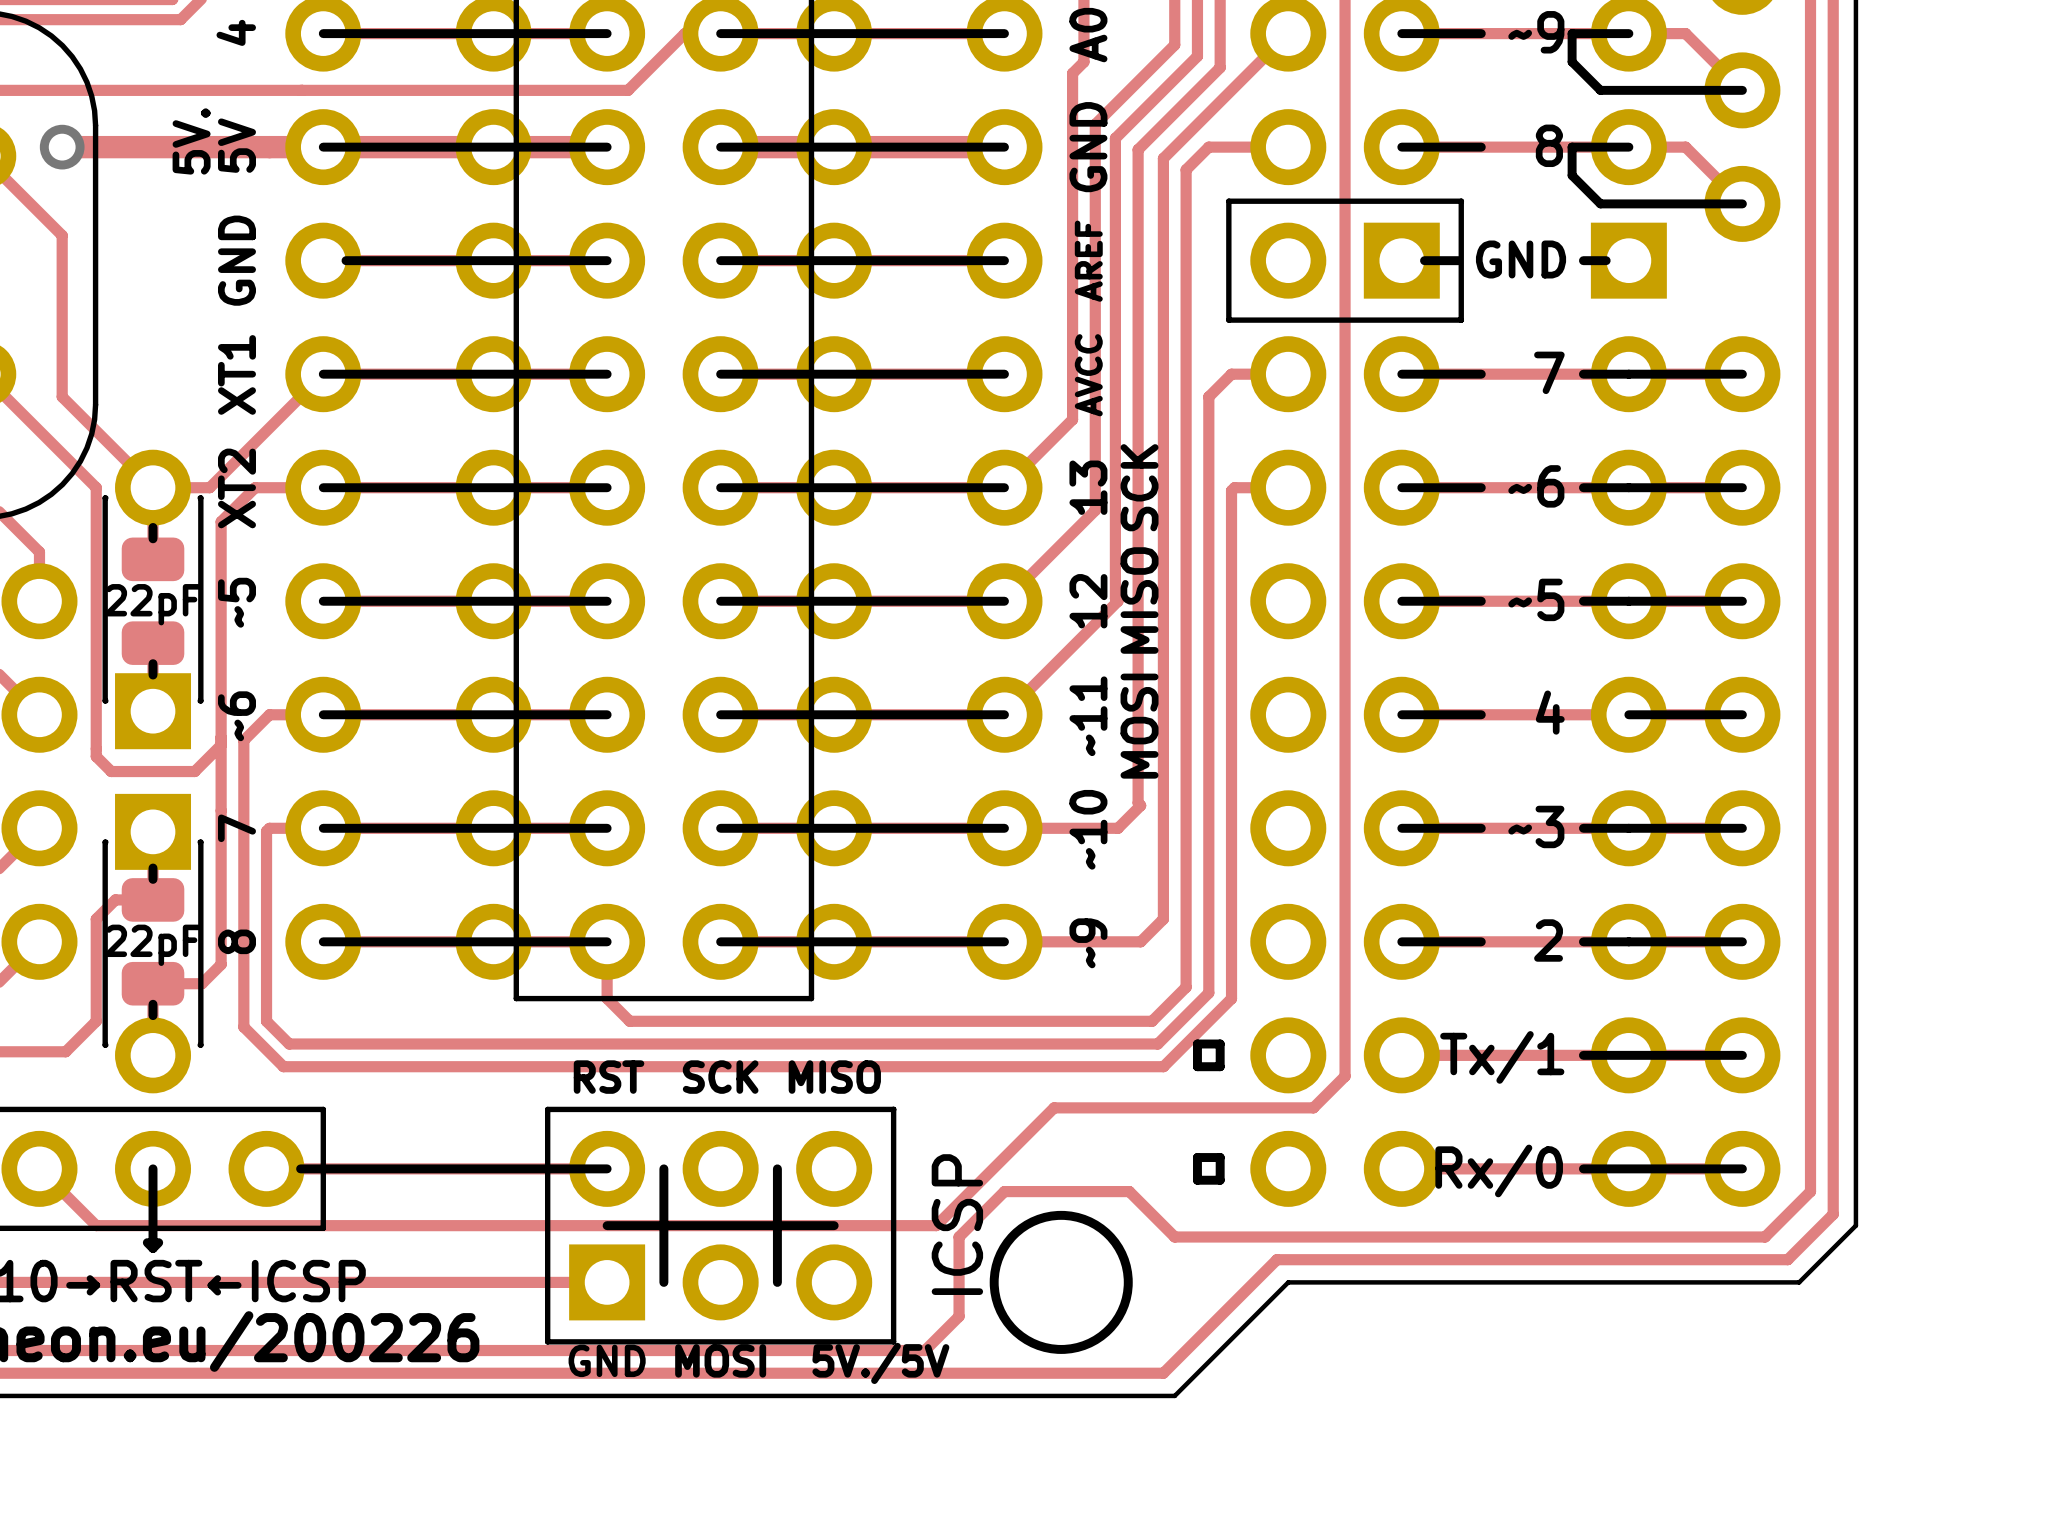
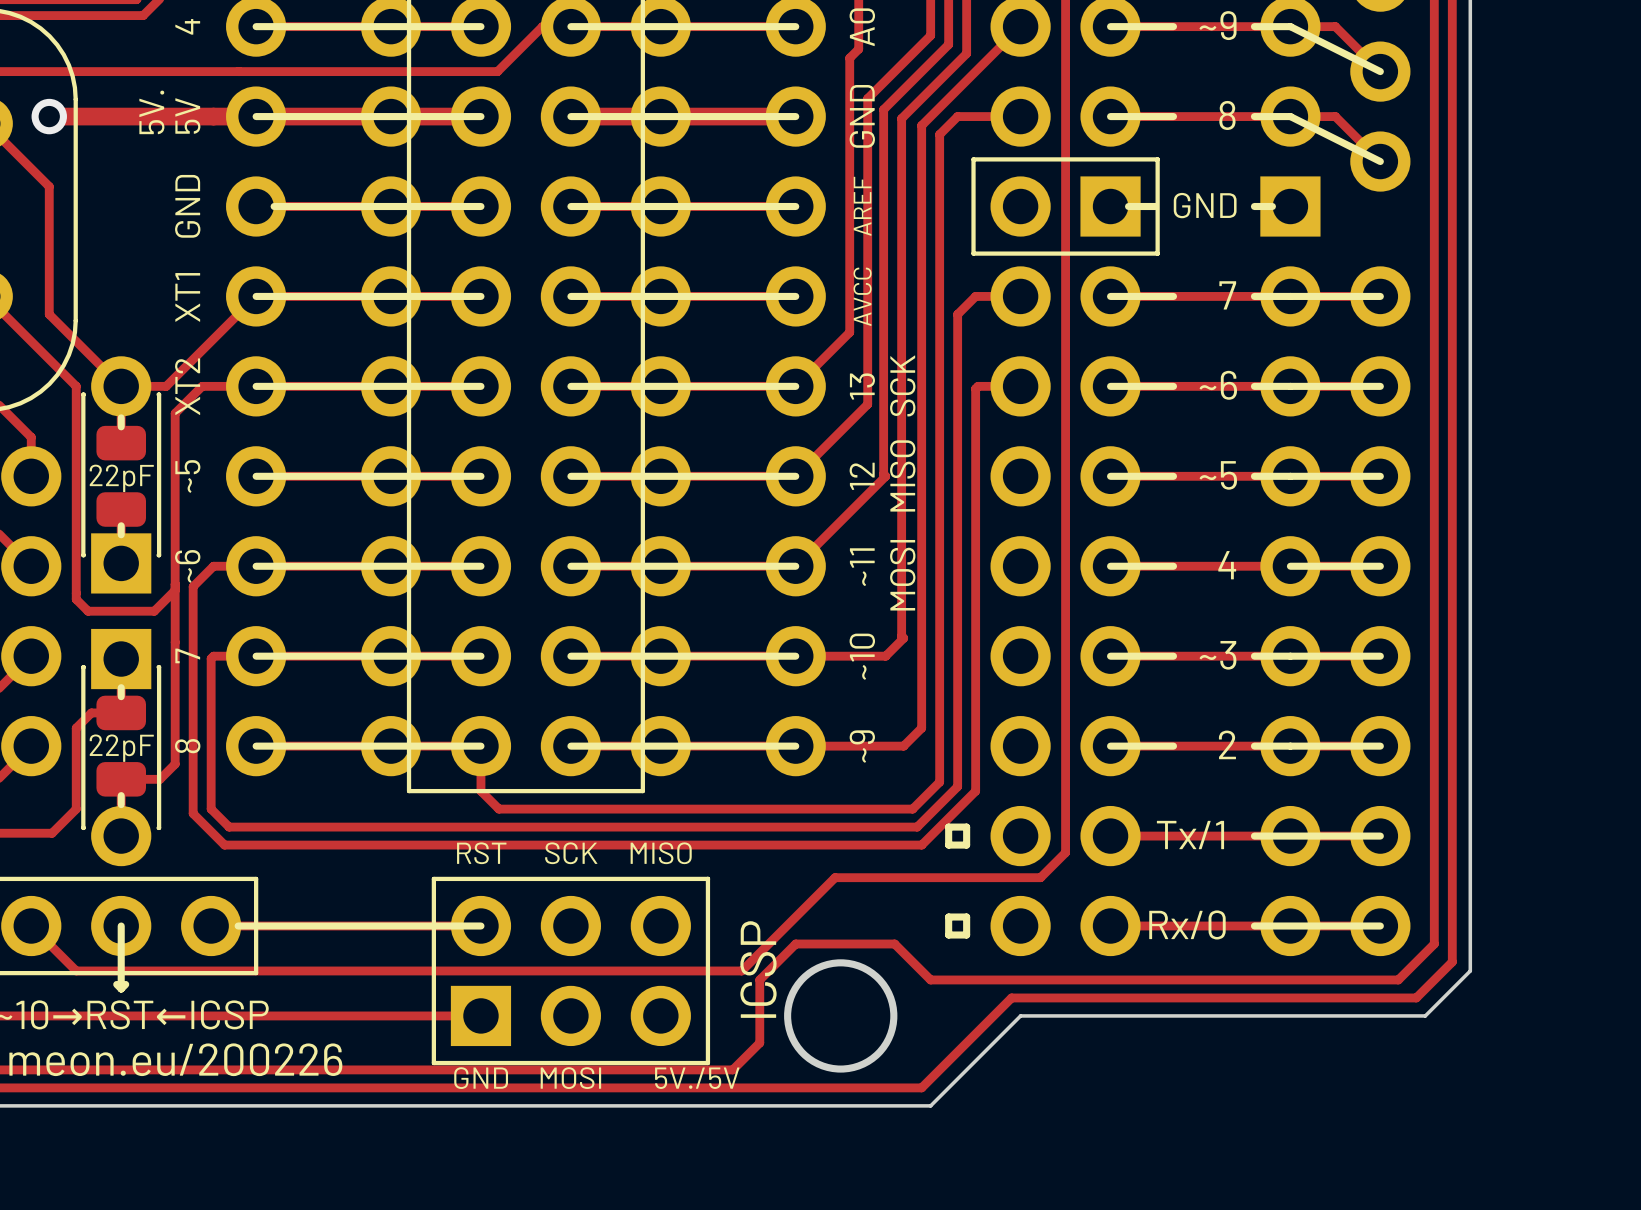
line: (1583, 33) (1572, 33) (1572, 61) (1600, 90) (1742, 90) -> (1290, 26) (1380, 71)
line: (1583, 147) (1572, 147) (1572, 175) (1600, 203) (1742, 203) -> (1290, 116) (1380, 161)
line: (663, 1168) (663, 1282) -> none
line: (777, 1168) (777, 1282) -> none
line: (607, 1225) (834, 1225) -> none

